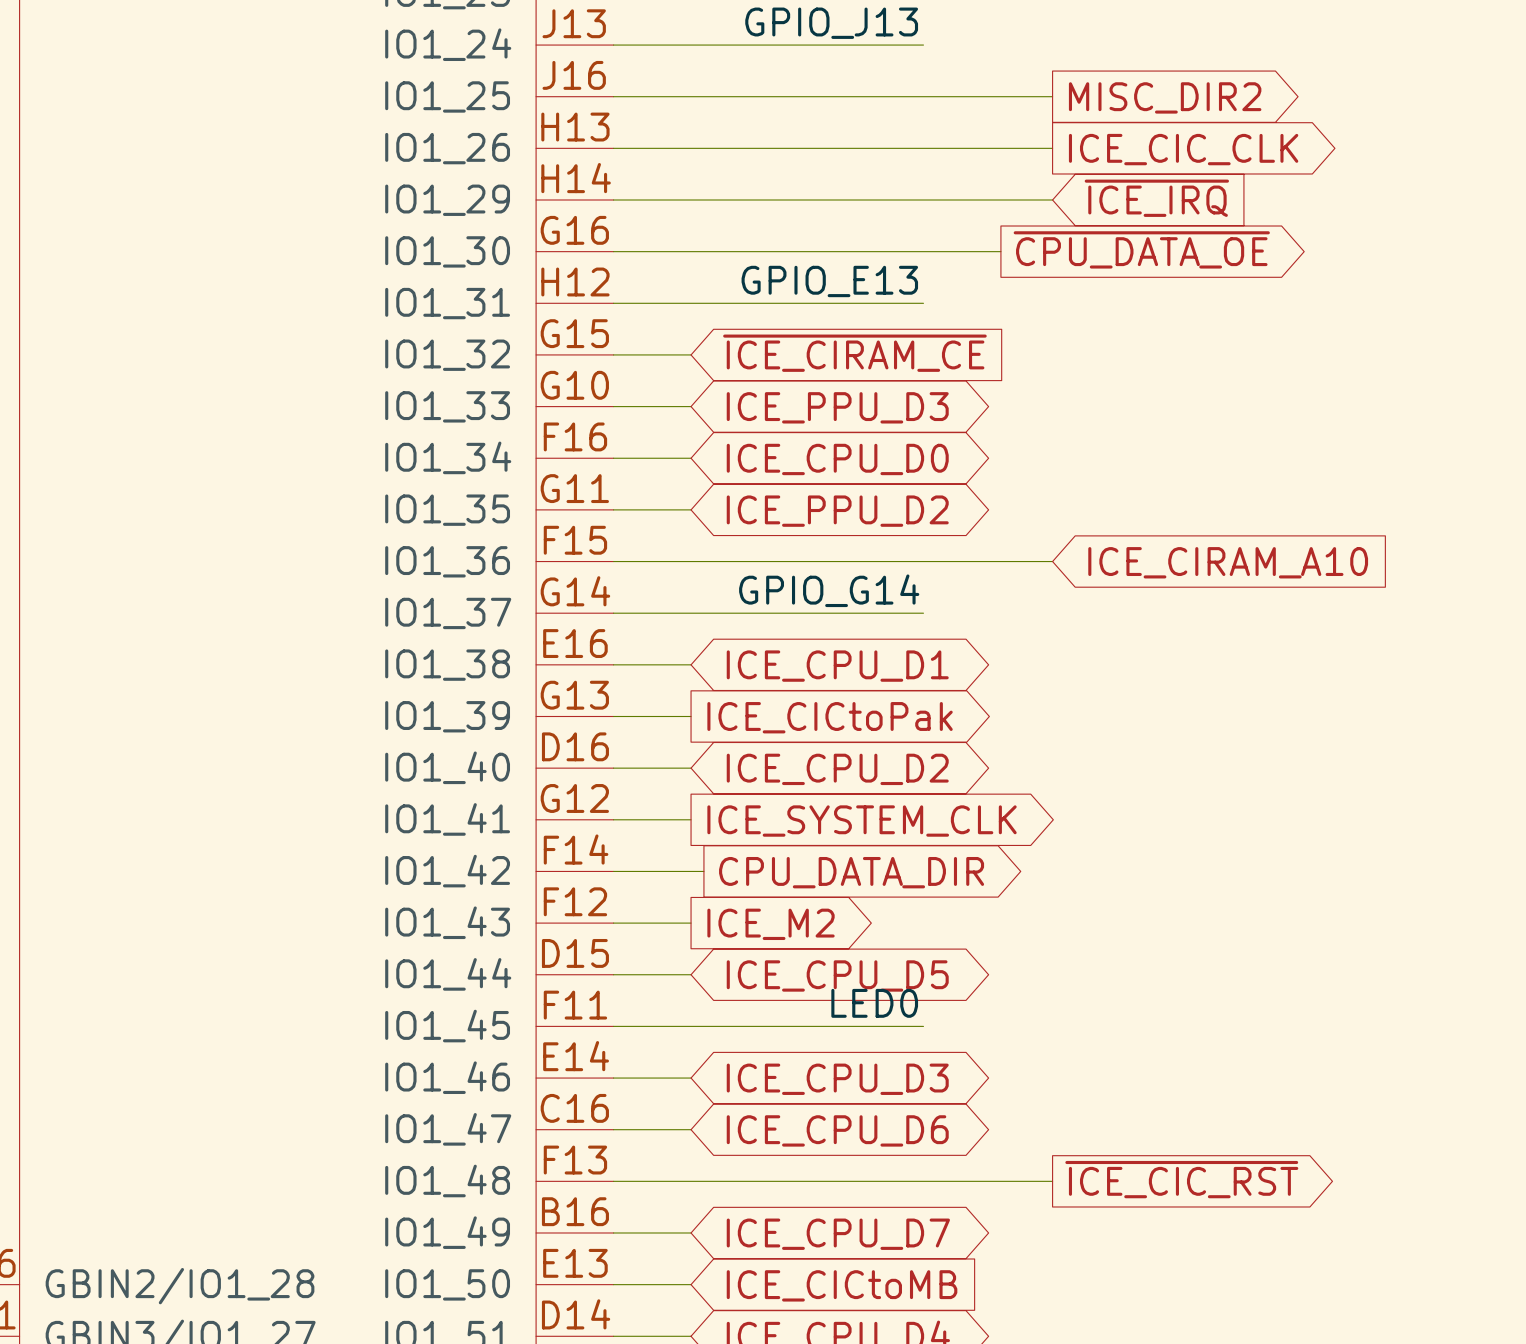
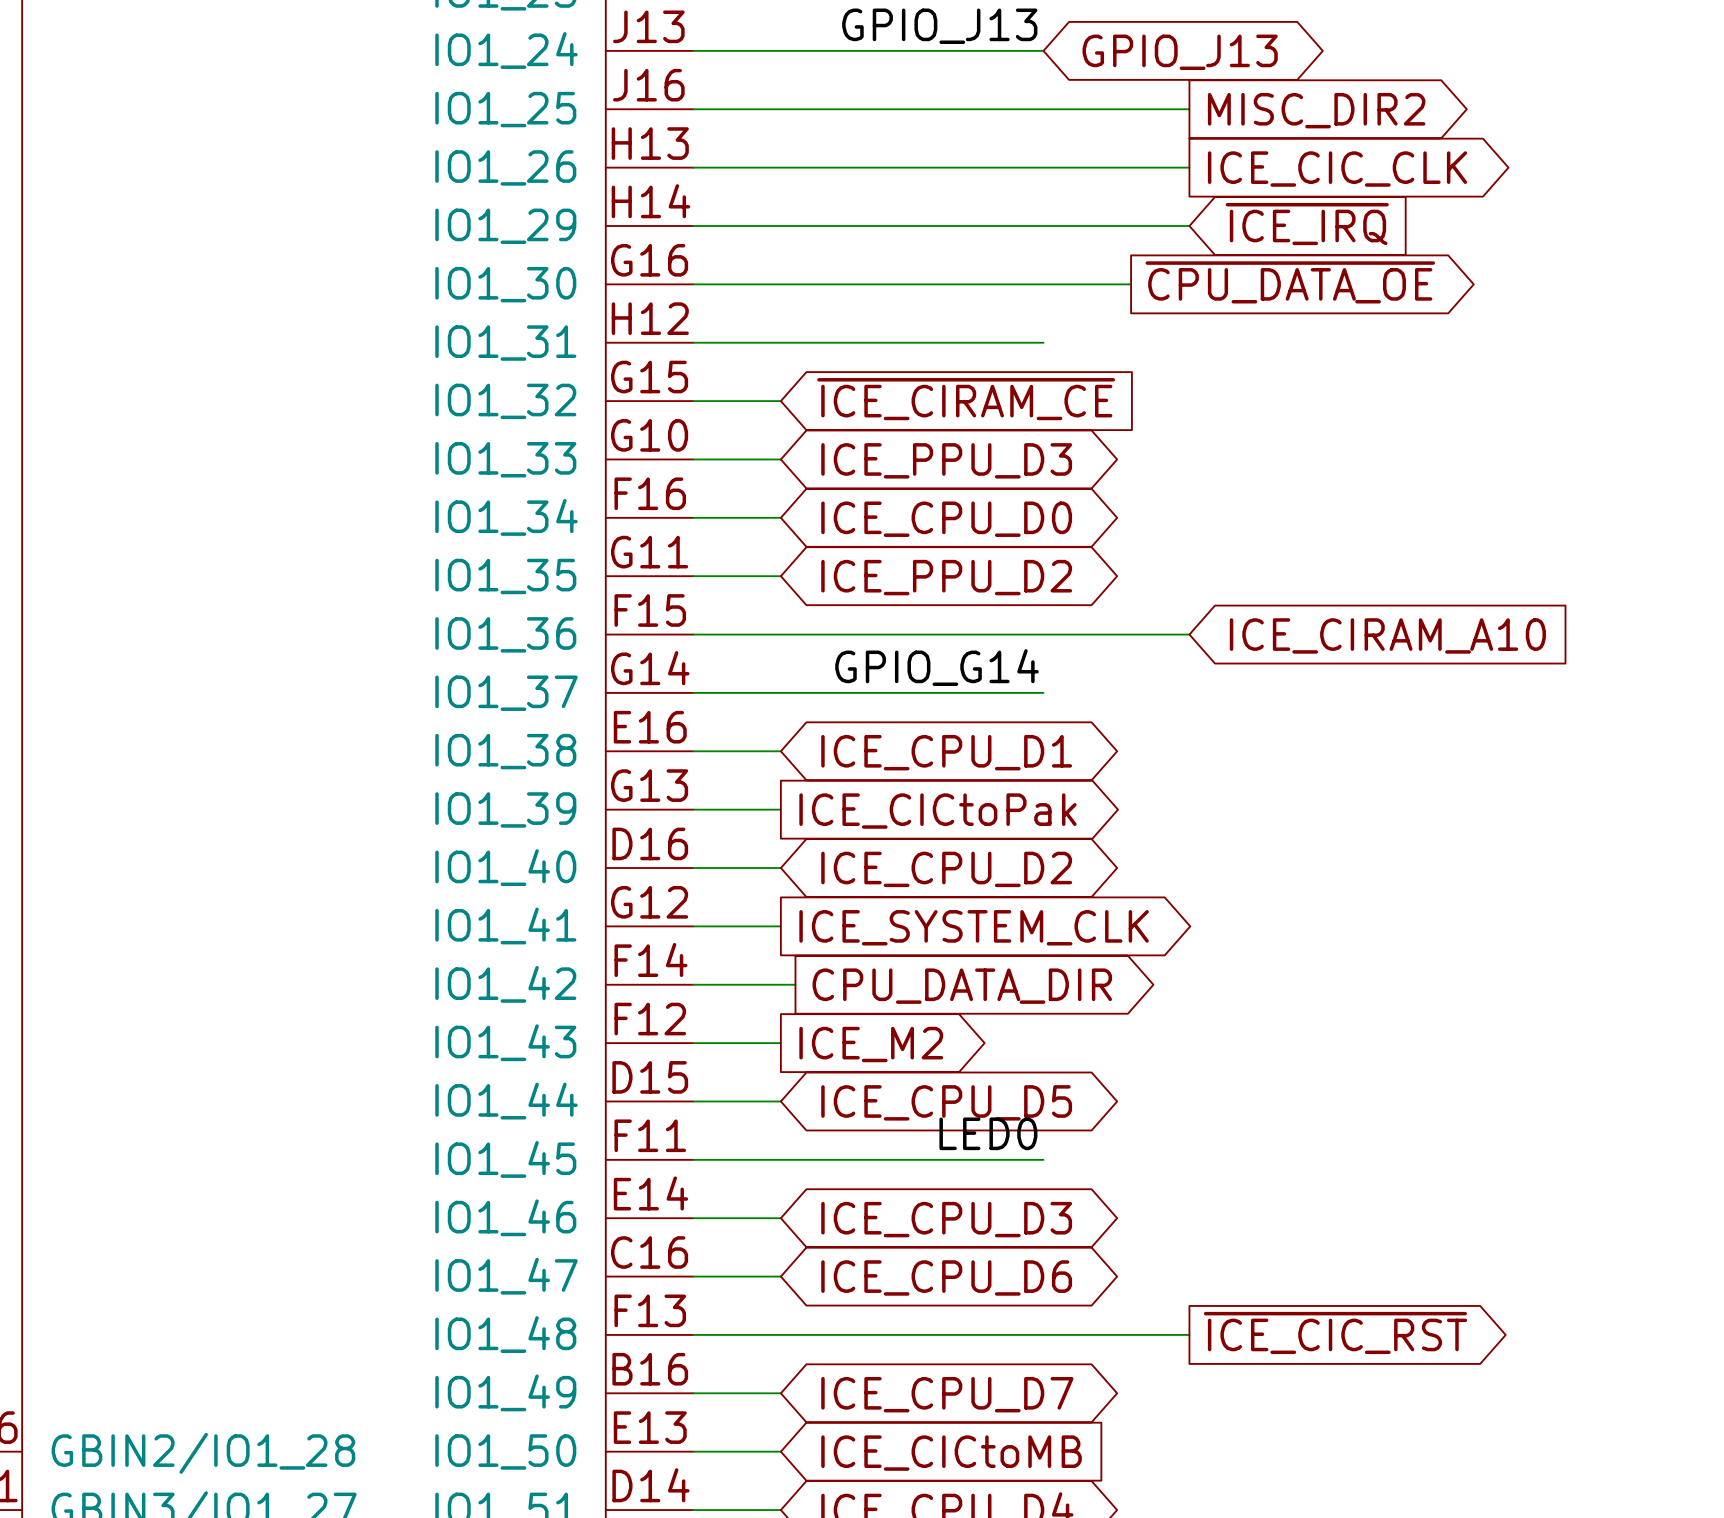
global label: none -> GPIO_J13 (1180, 52)
label: GPIO_E13 (829, 281) -> none

